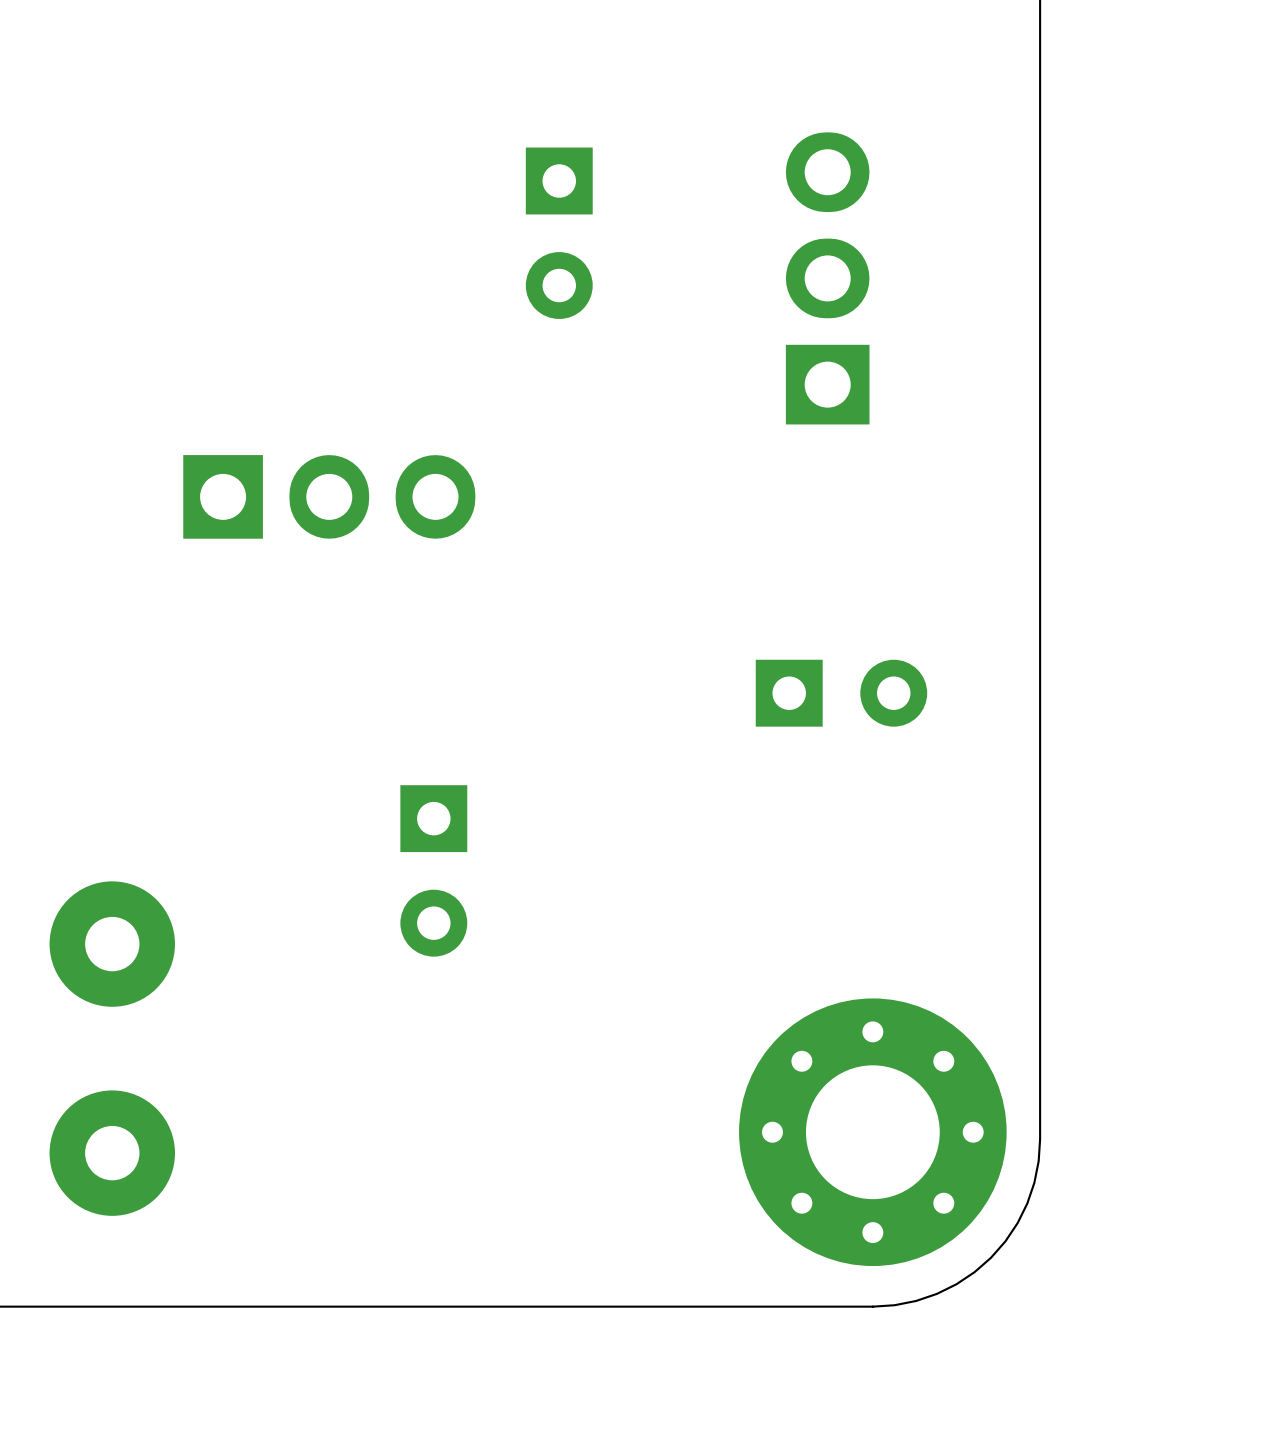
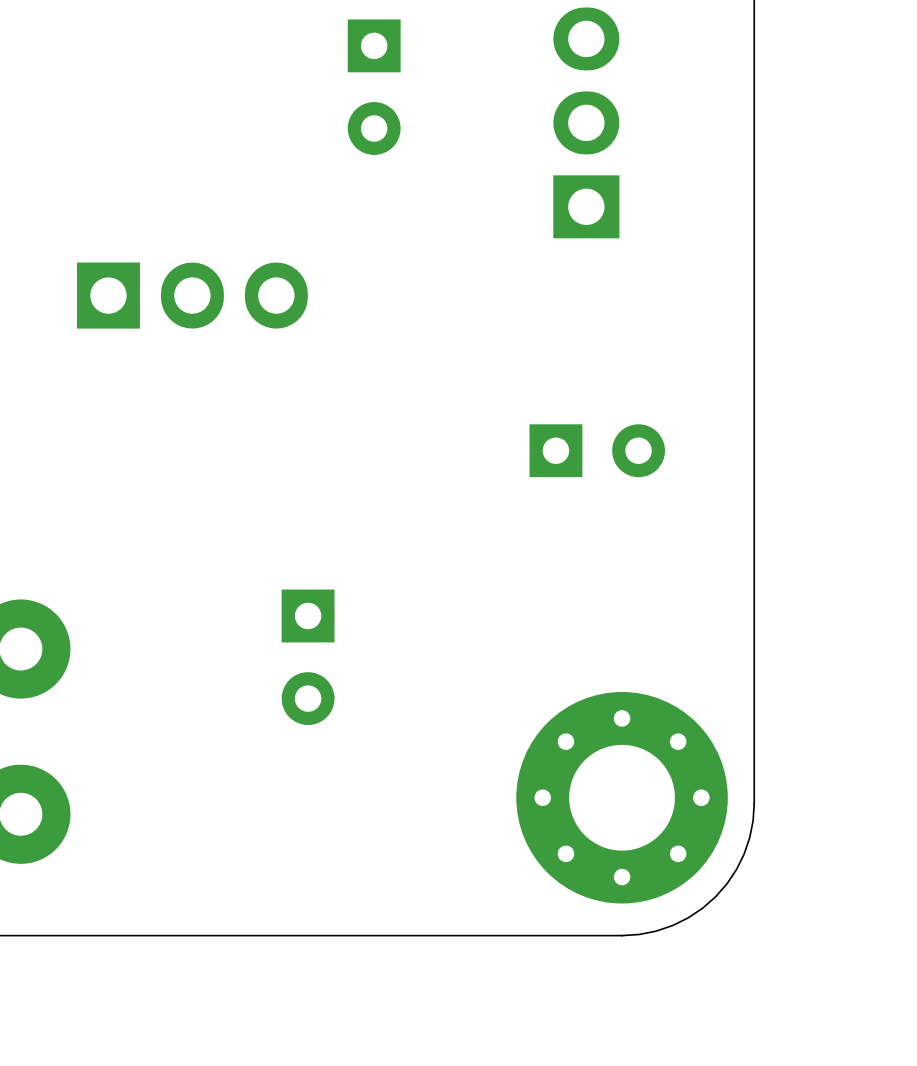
part position: (433, 870) -> (308, 657)

